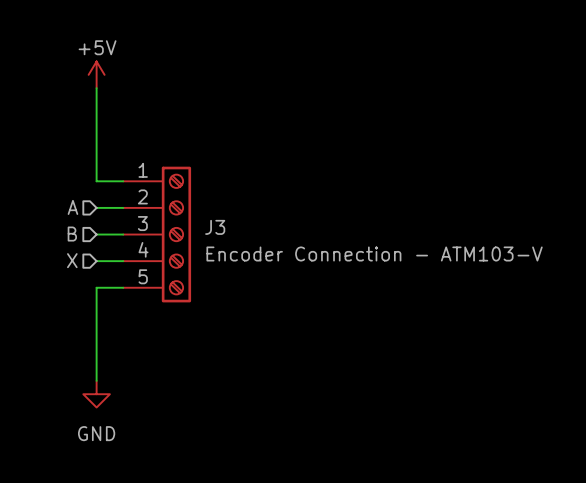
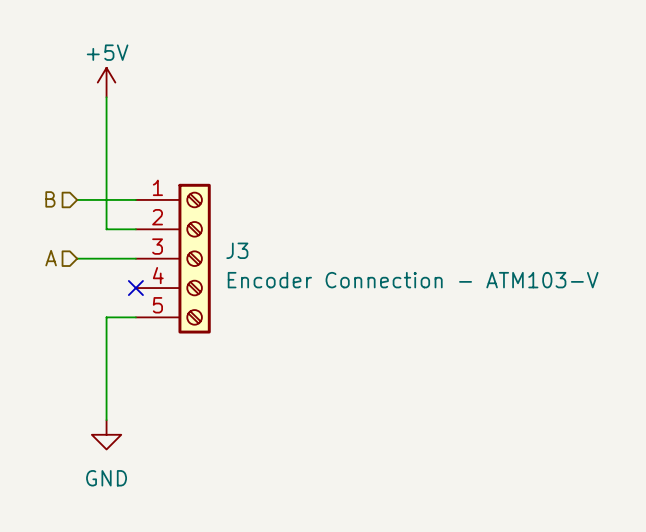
wire: none -> (77, 199) (106, 199) (106, 229)
hierarchical label position: A (72, 207) -> A (51, 258)
hierarchical label position: B (72, 234) -> B (50, 199)
hierarchical label: X (72, 260) -> none
wire: (96, 261) (123, 261) -> (77, 258) (106, 258)
no-connect mark: none -> (135, 288)

